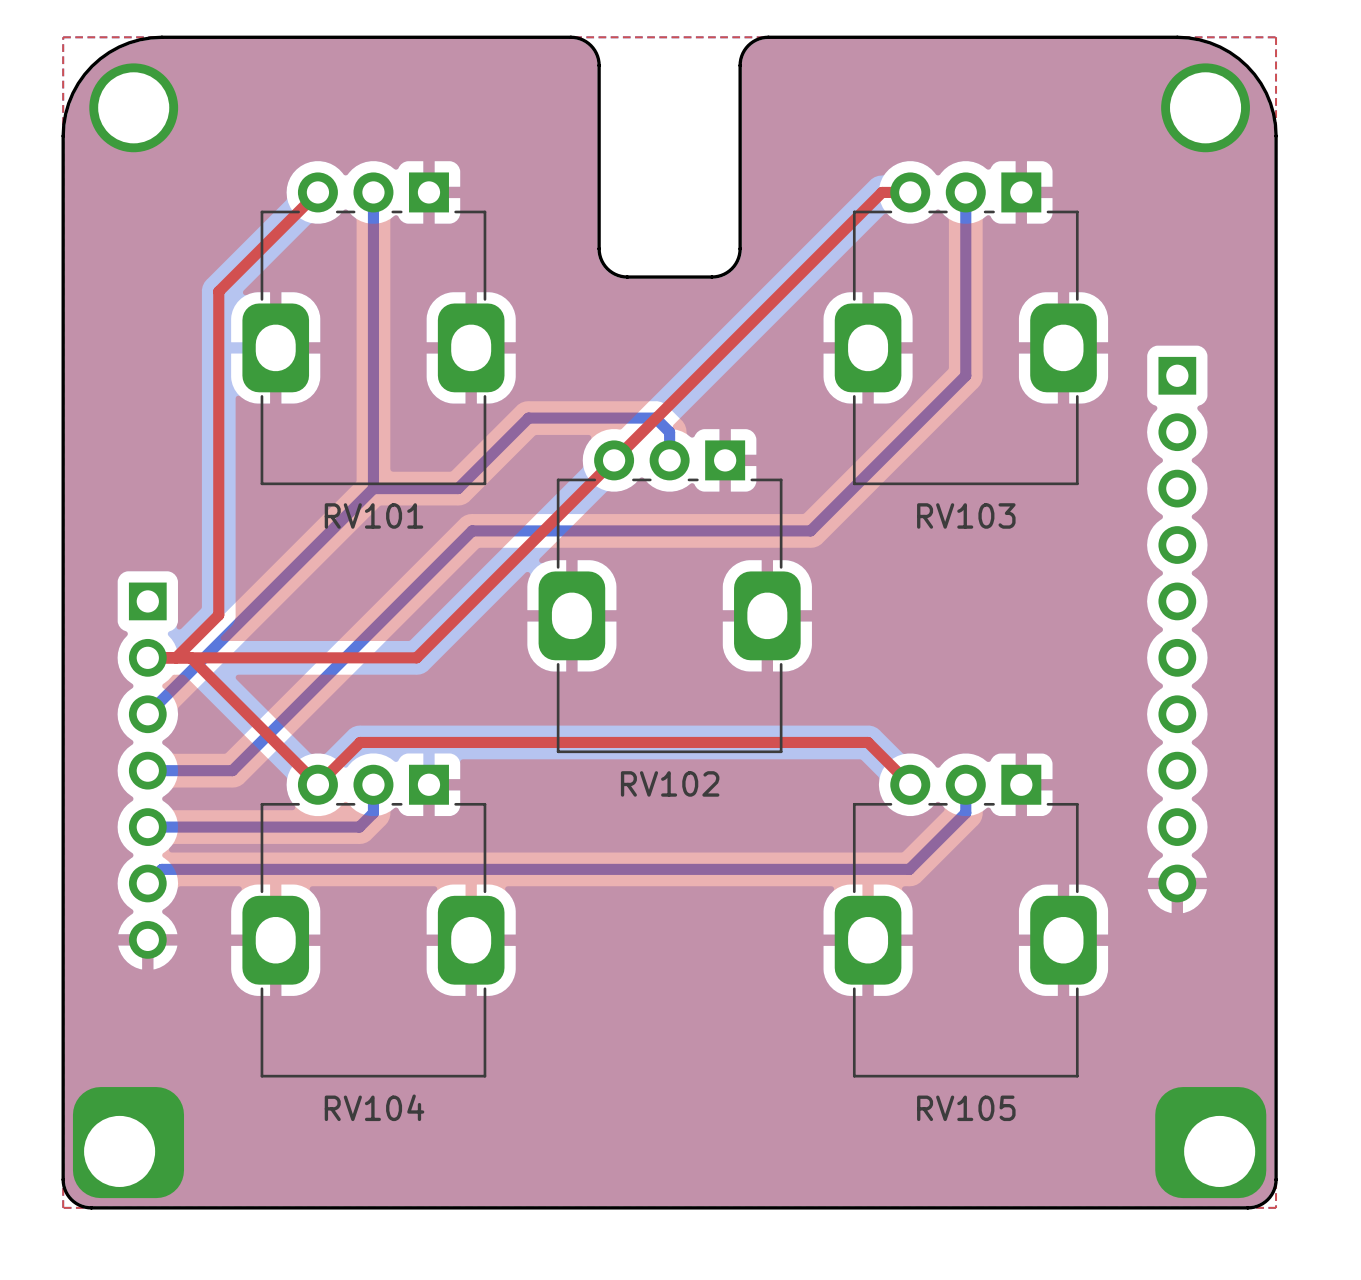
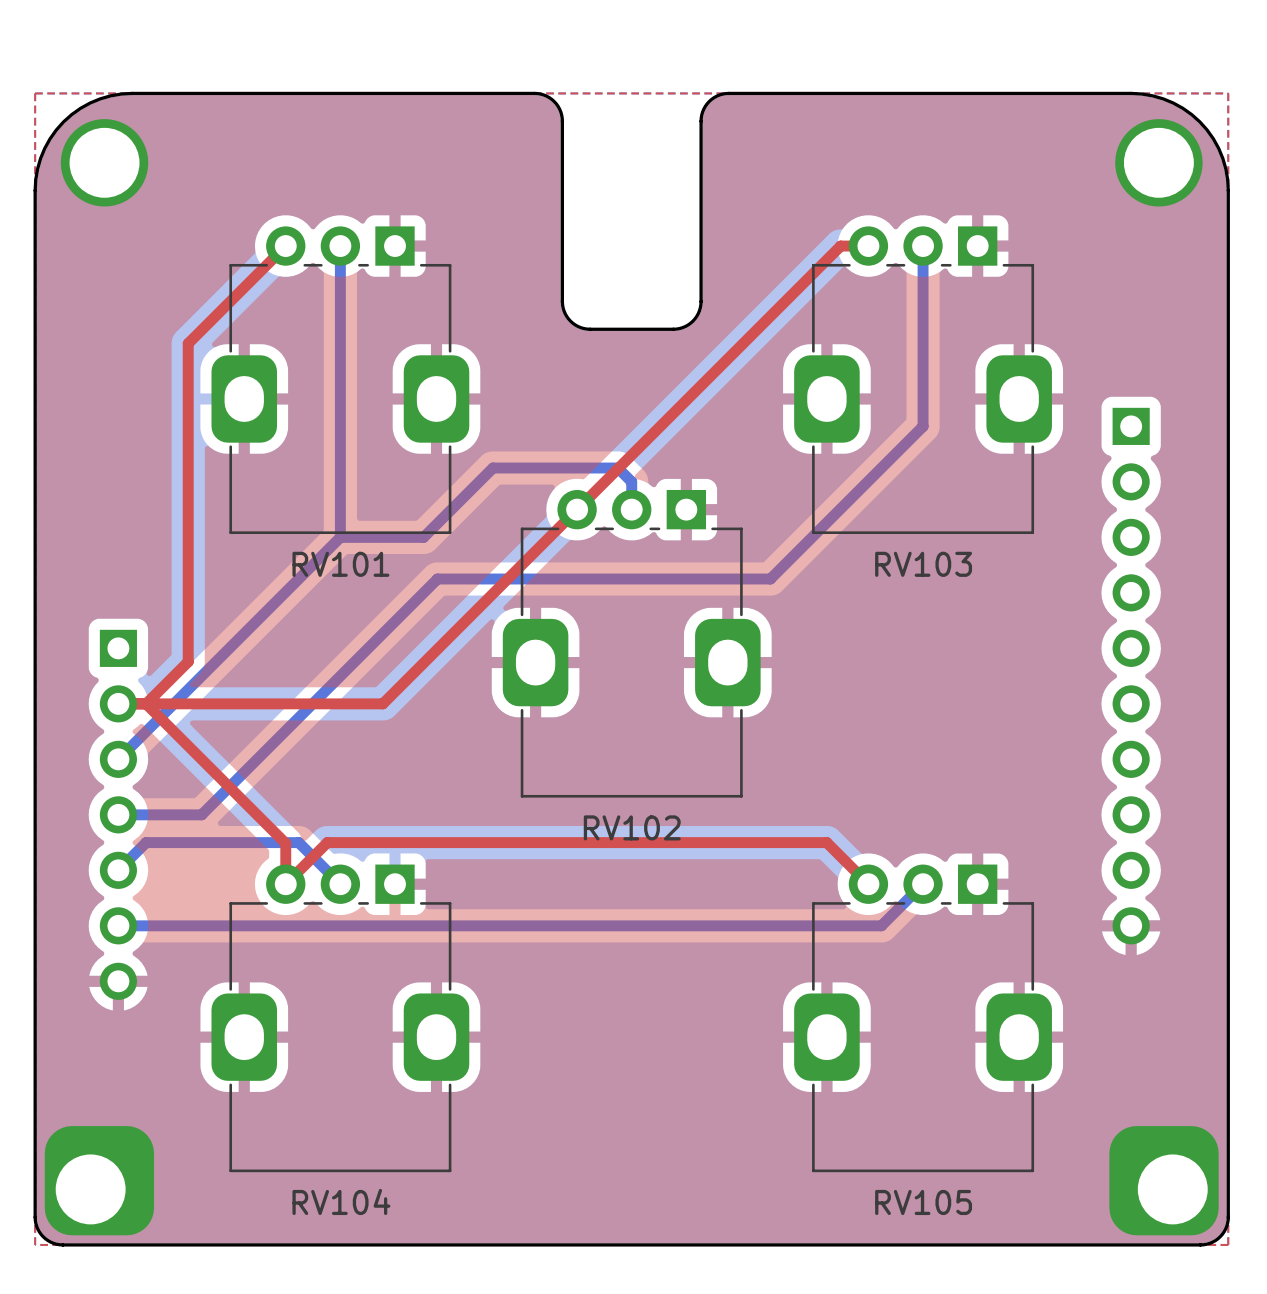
top track: none -> (146, 703) (285, 843) (285, 884) (327, 842) (826, 842) (868, 884)
top track: (191, 657) (317, 784) (360, 742) (867, 742) (910, 784) -> none
bottom track: (373, 784) (373, 813) (359, 827) (147, 827) -> (340, 884) (298, 842) (146, 842) (118, 870)
bottom track: (965, 784) (965, 813) (909, 869) (161, 869) (147, 883) -> (923, 884) (881, 925) (118, 925)
RV104 position: (373, 921) -> (340, 1018)
RV105 position: (965, 921) -> (923, 1018)

